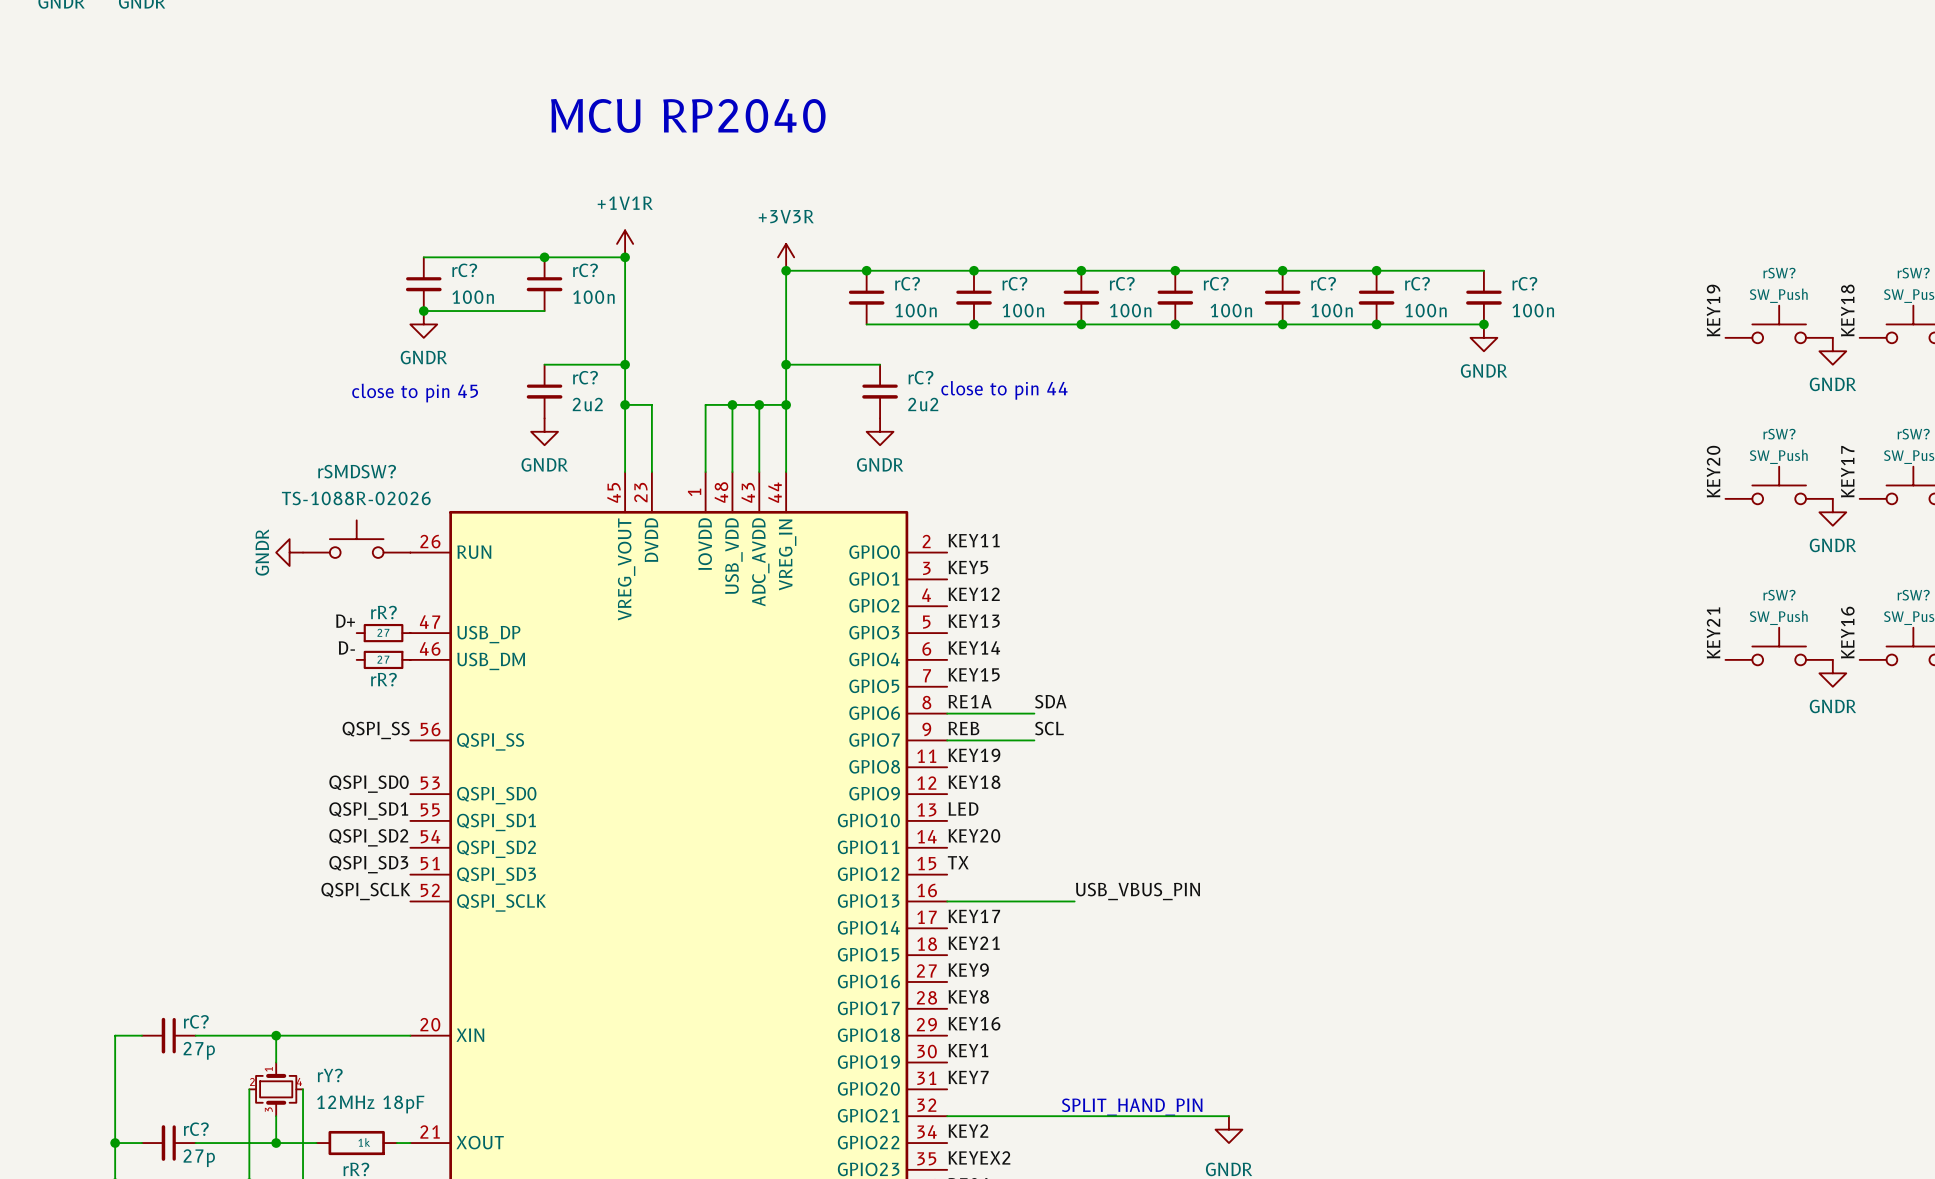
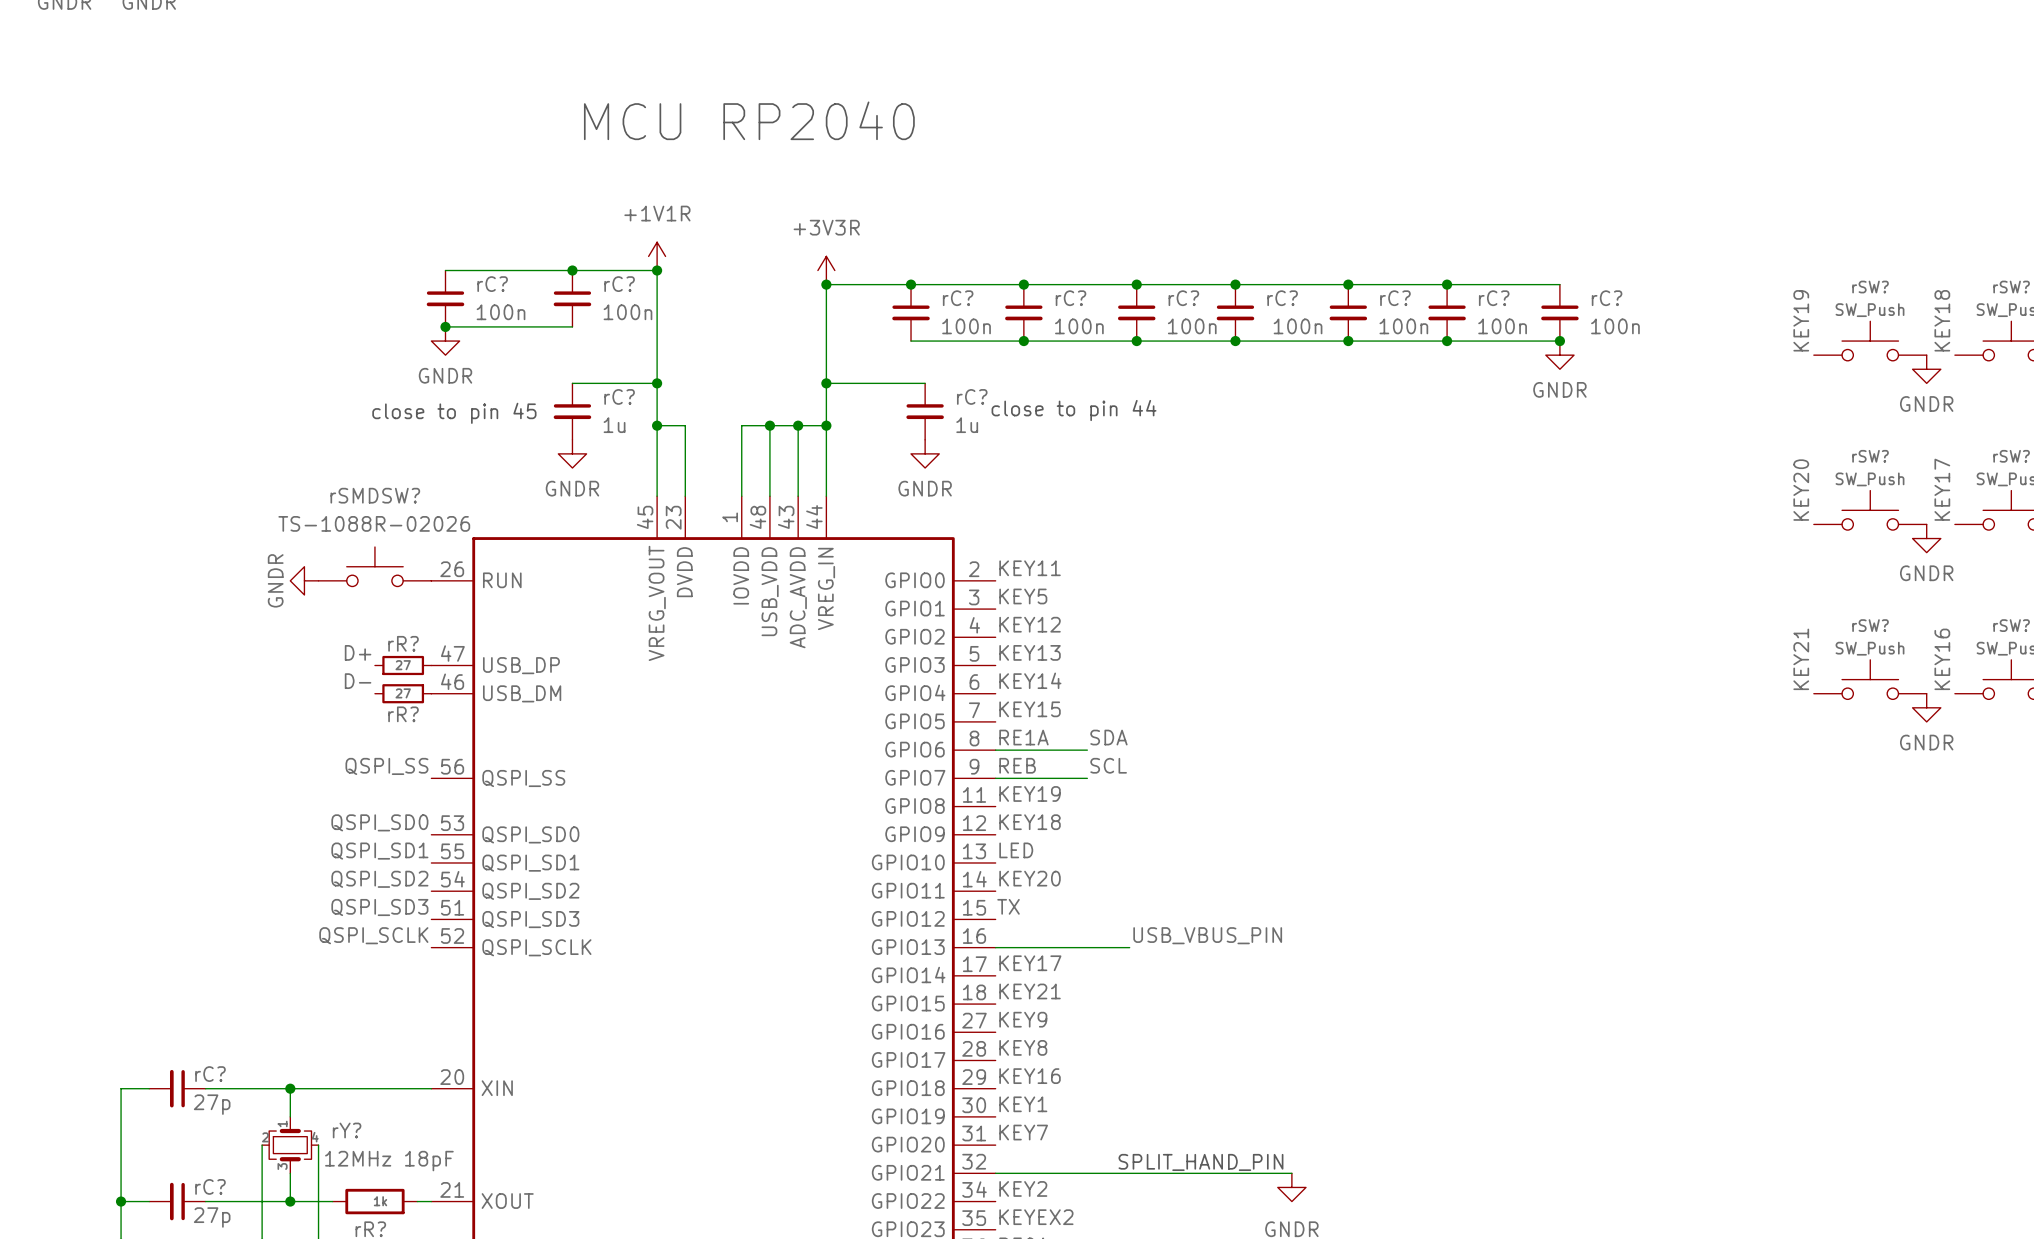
rC? value: 2u2 (587, 404) -> 1u (614, 425)
rC? value: 2u2 (923, 404) -> 1u (967, 425)

